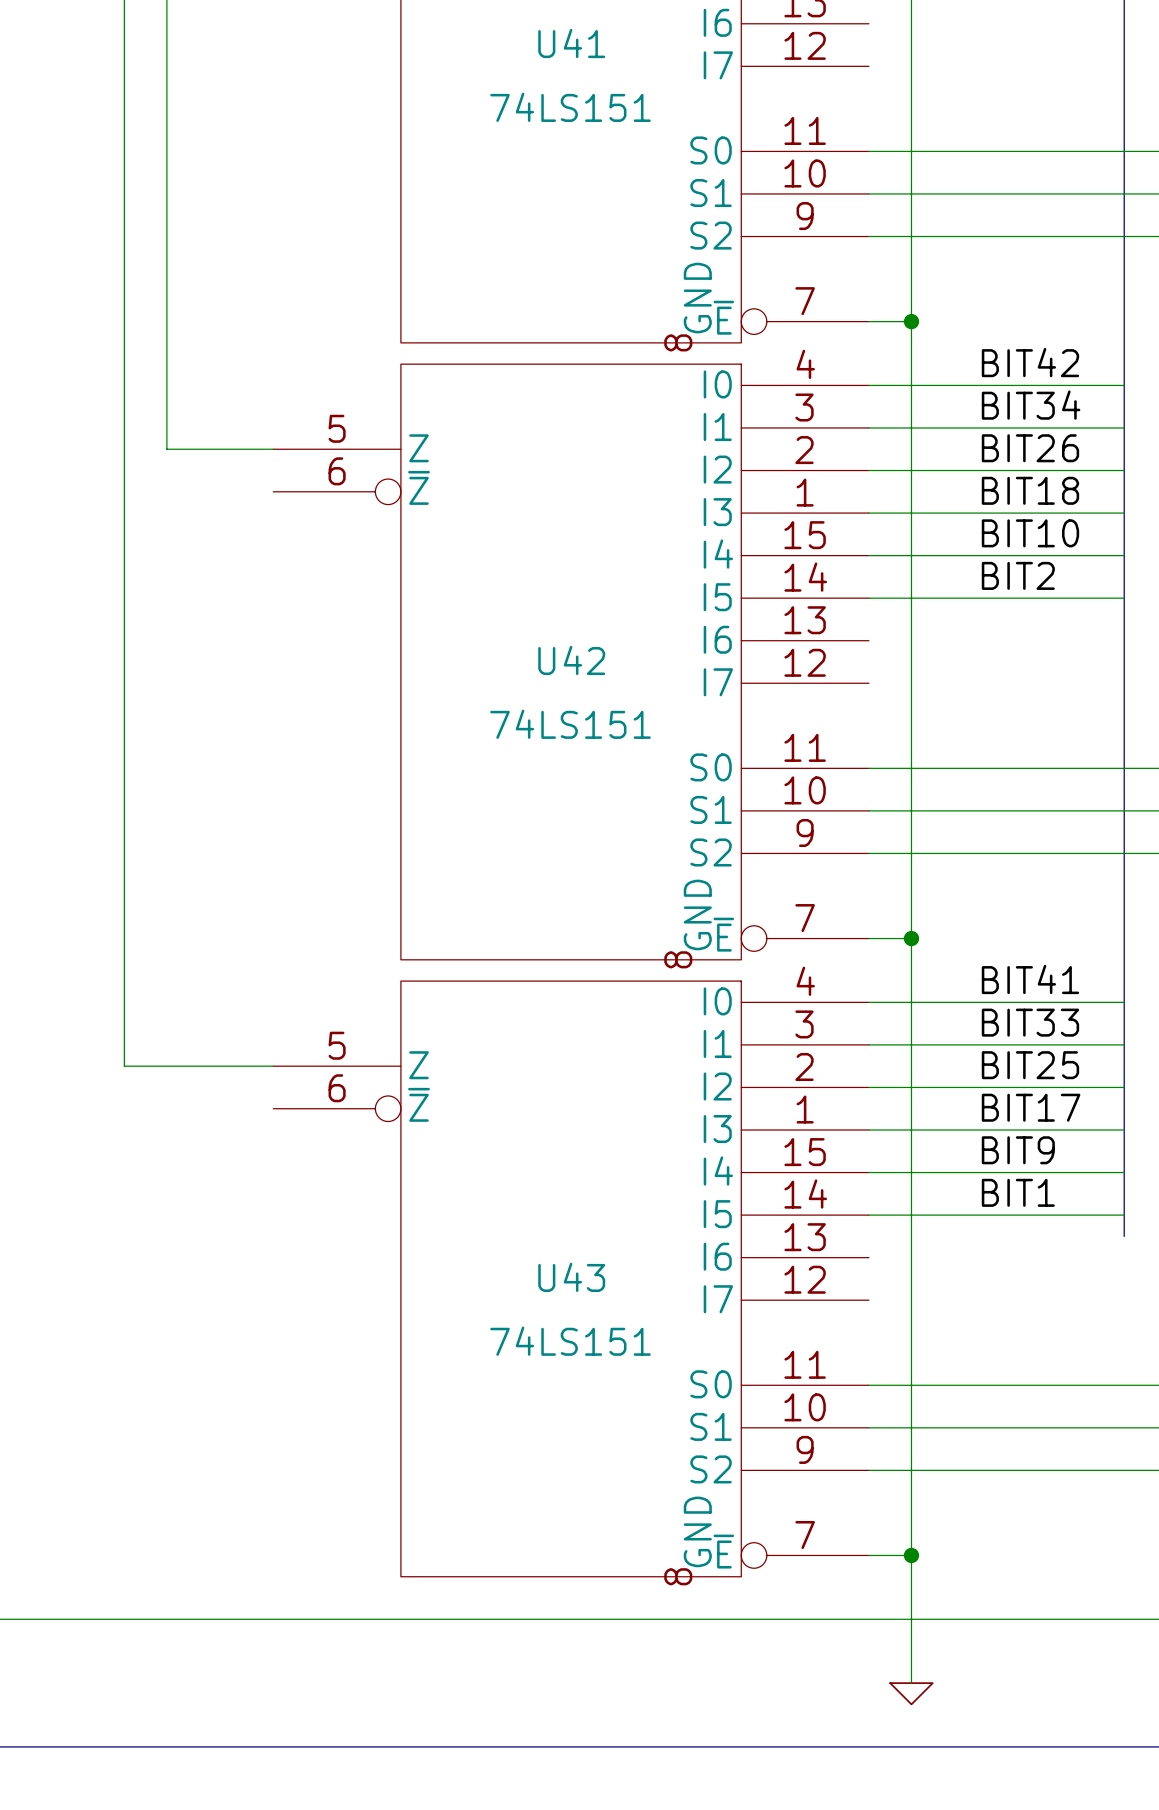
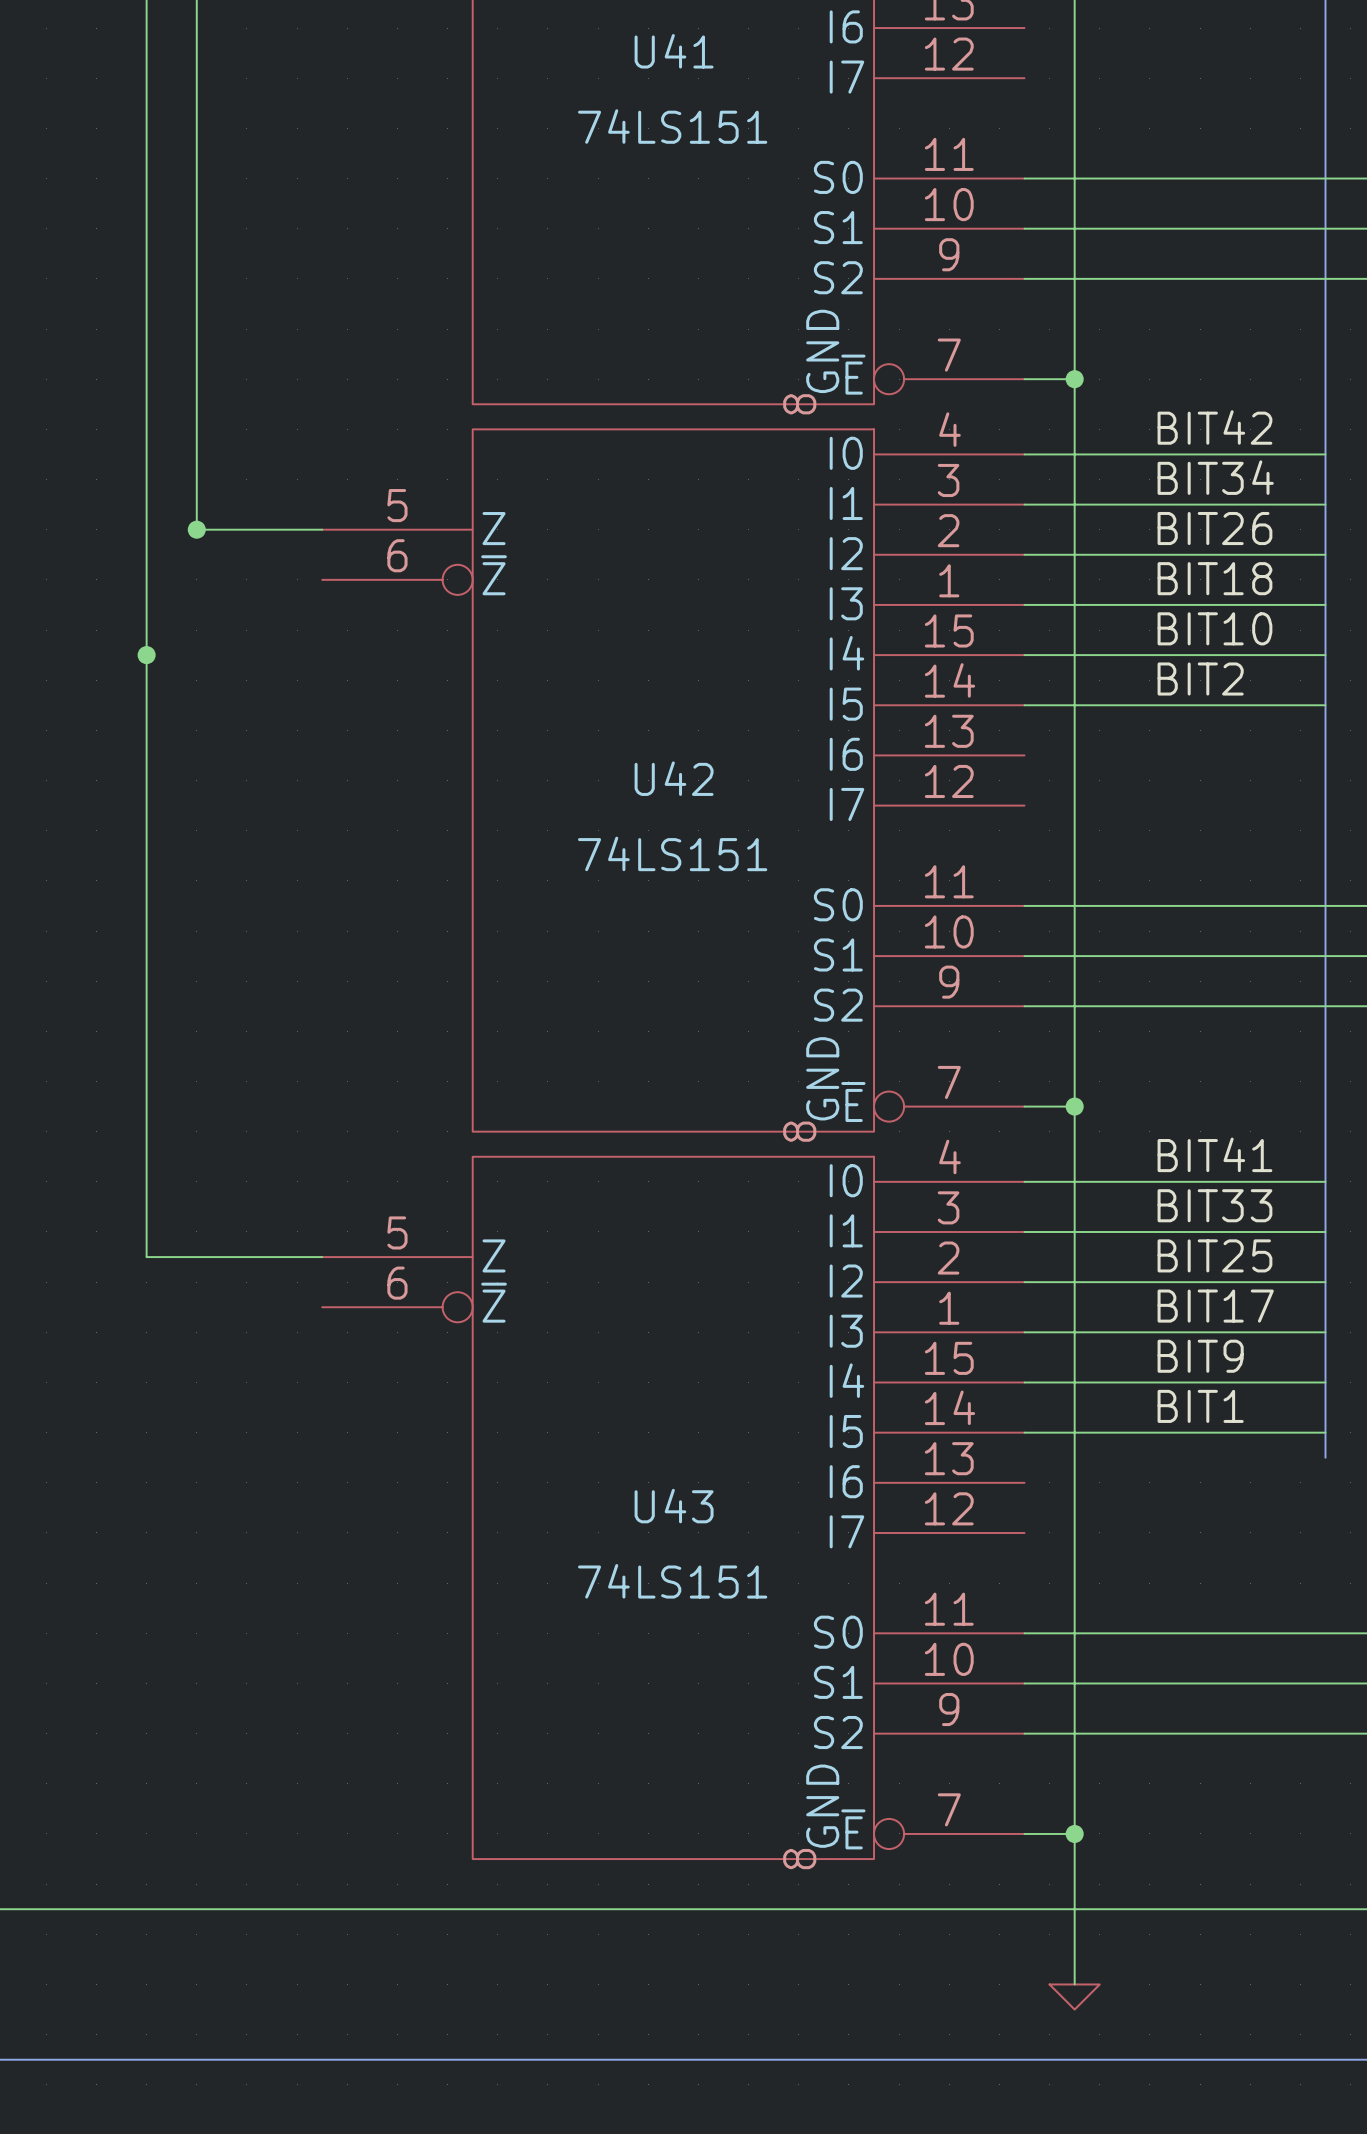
junction: none -> (196, 529)
junction: none -> (146, 655)

